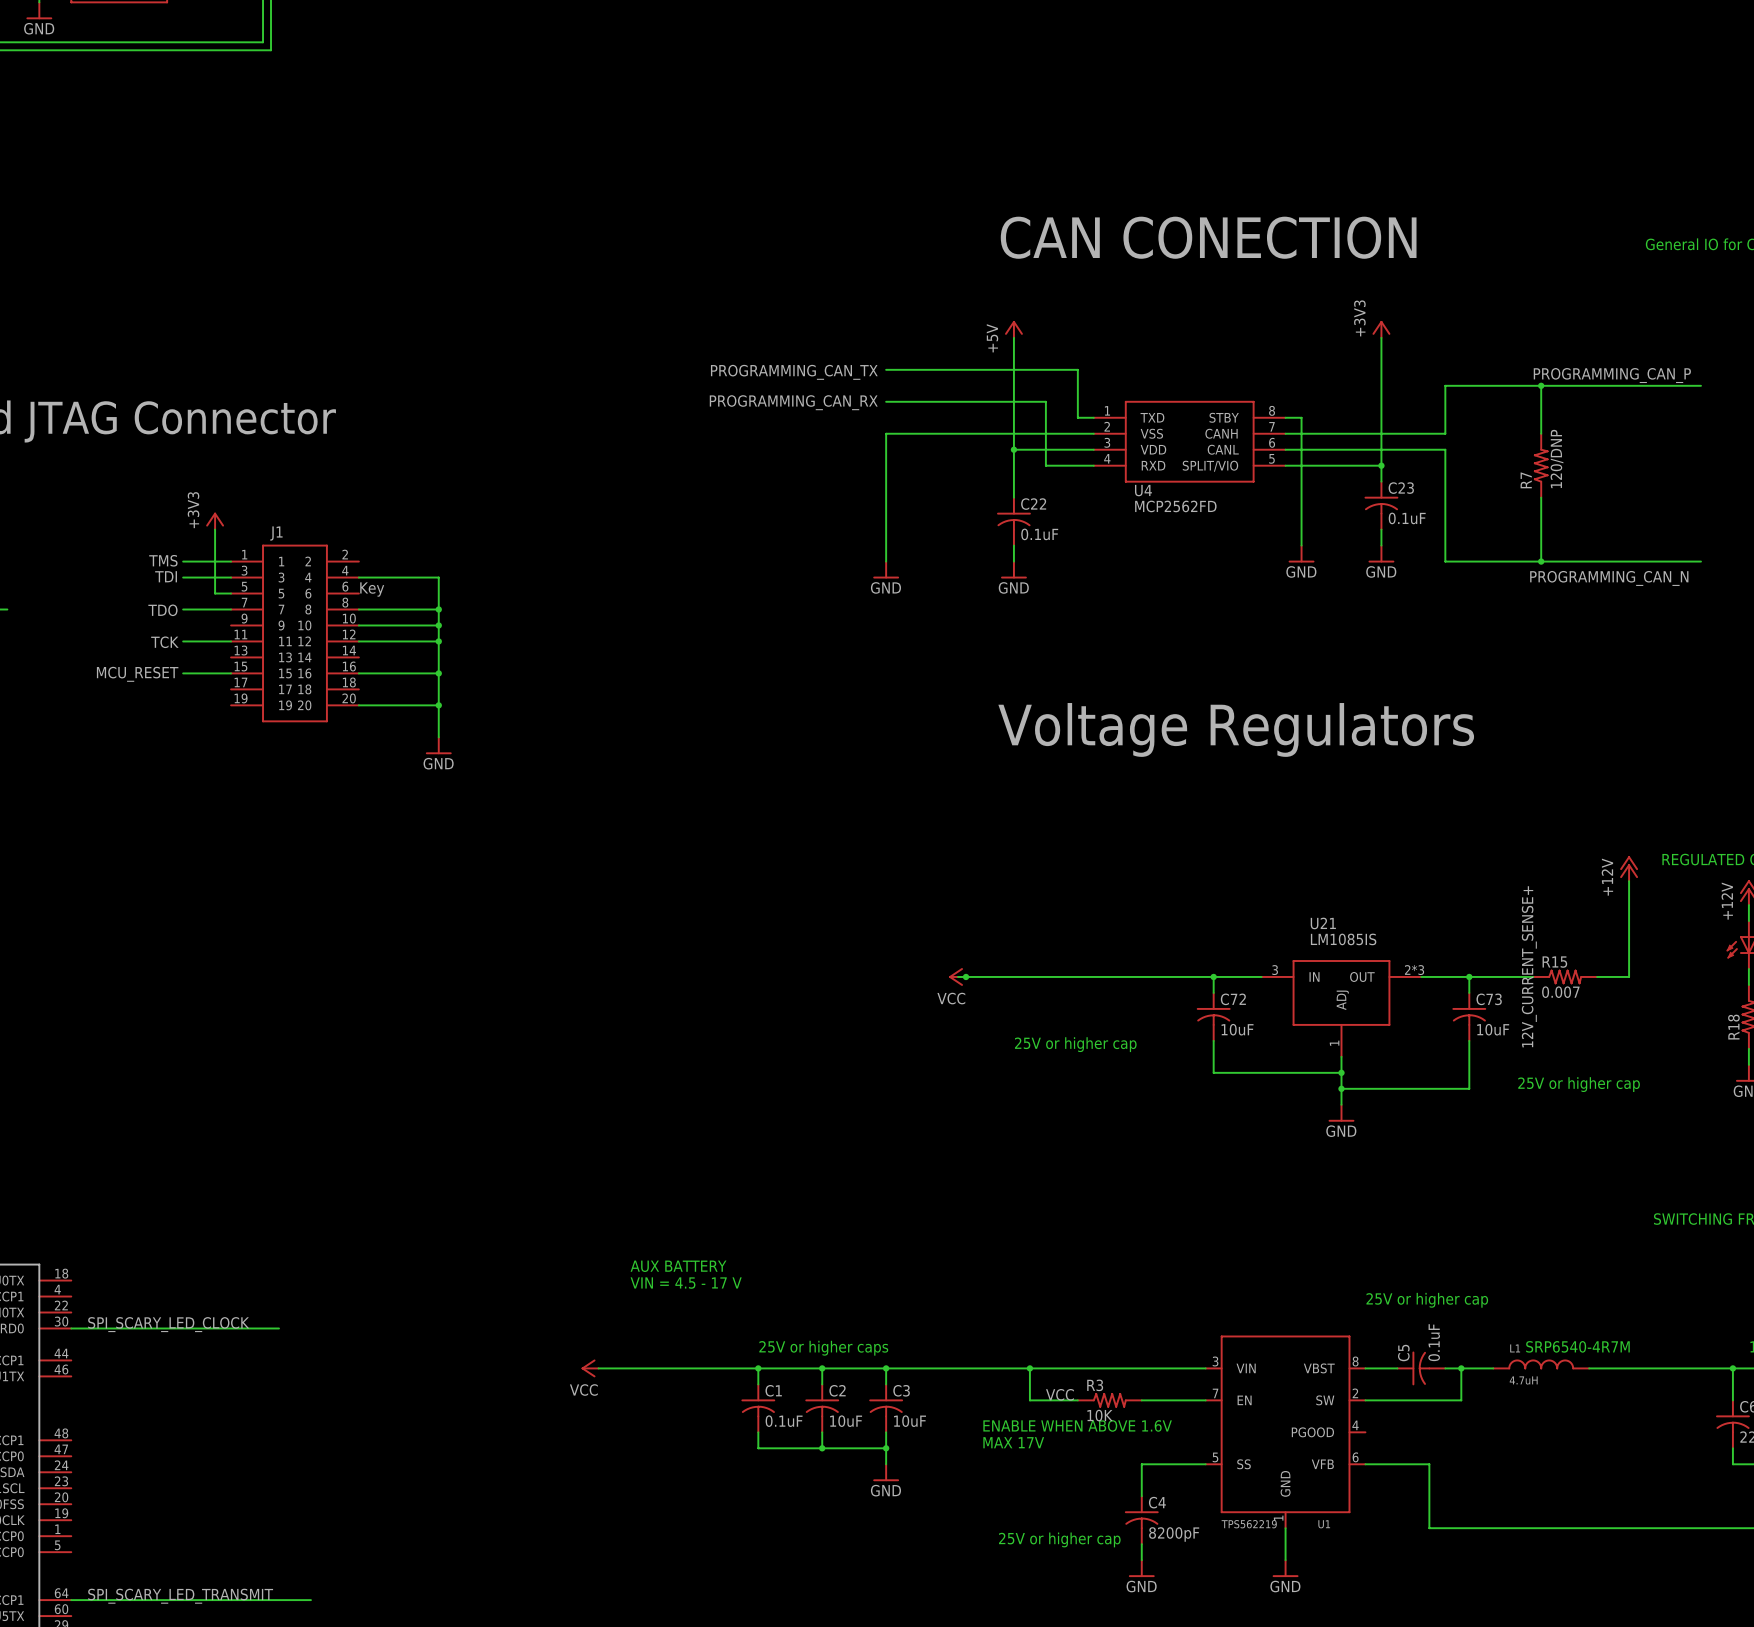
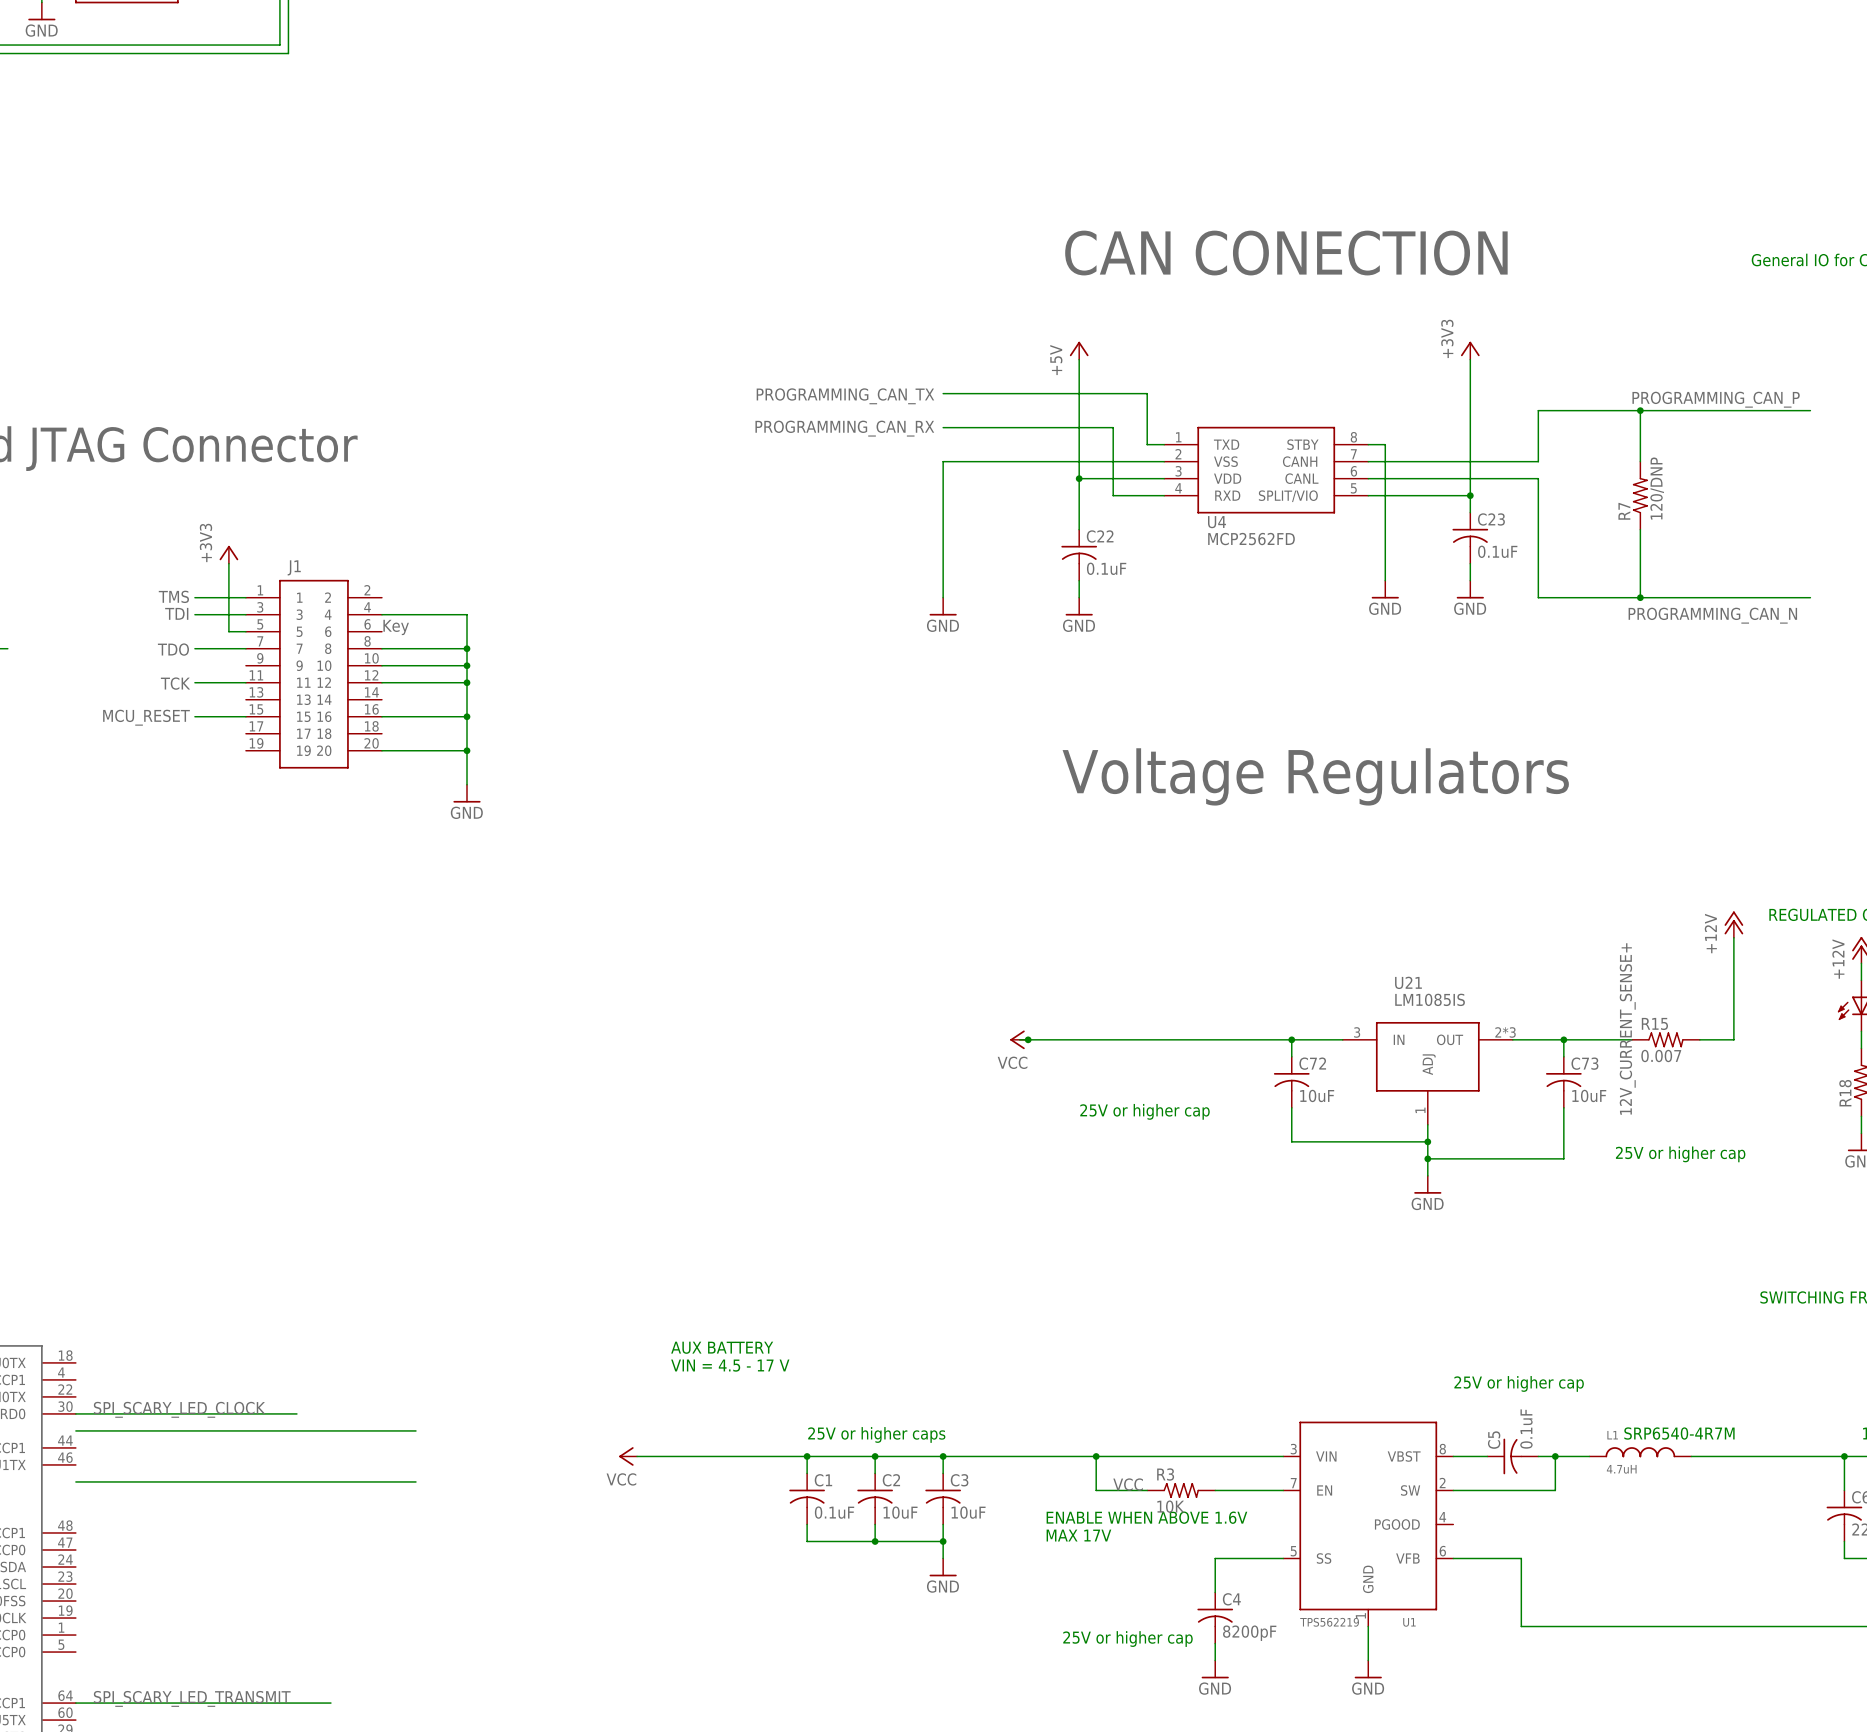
wire: none -> (75, 1430) (415, 1430)
wire: none -> (75, 1481) (415, 1481)

